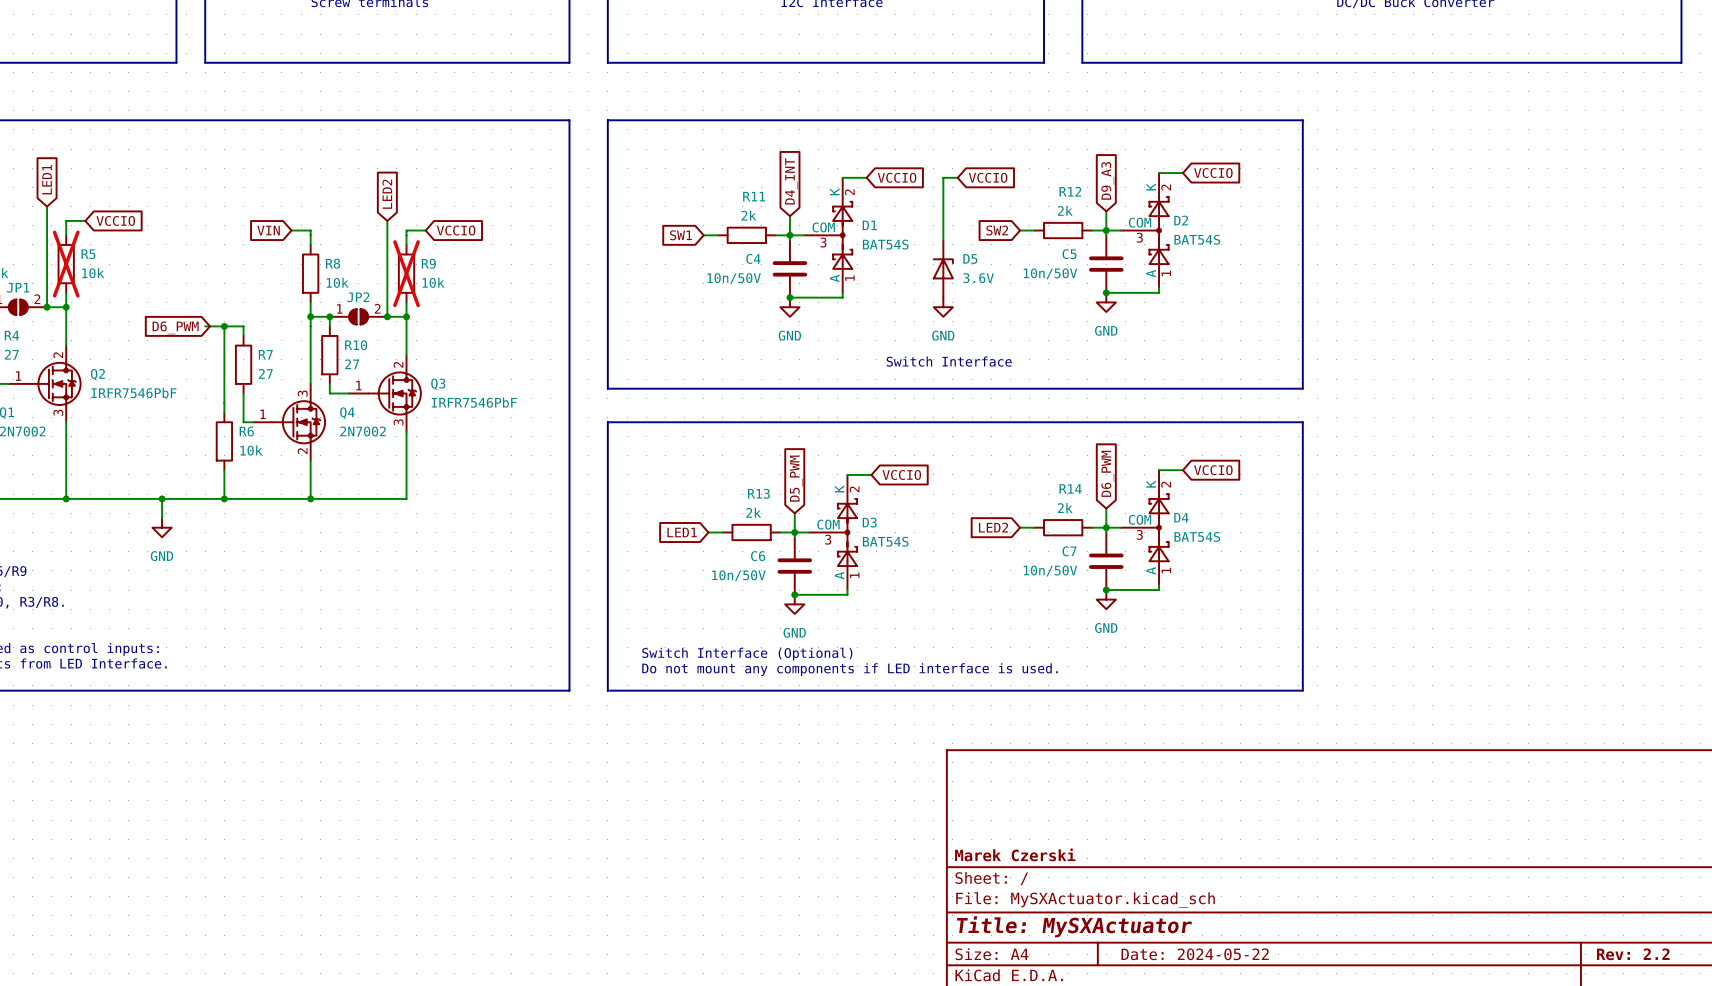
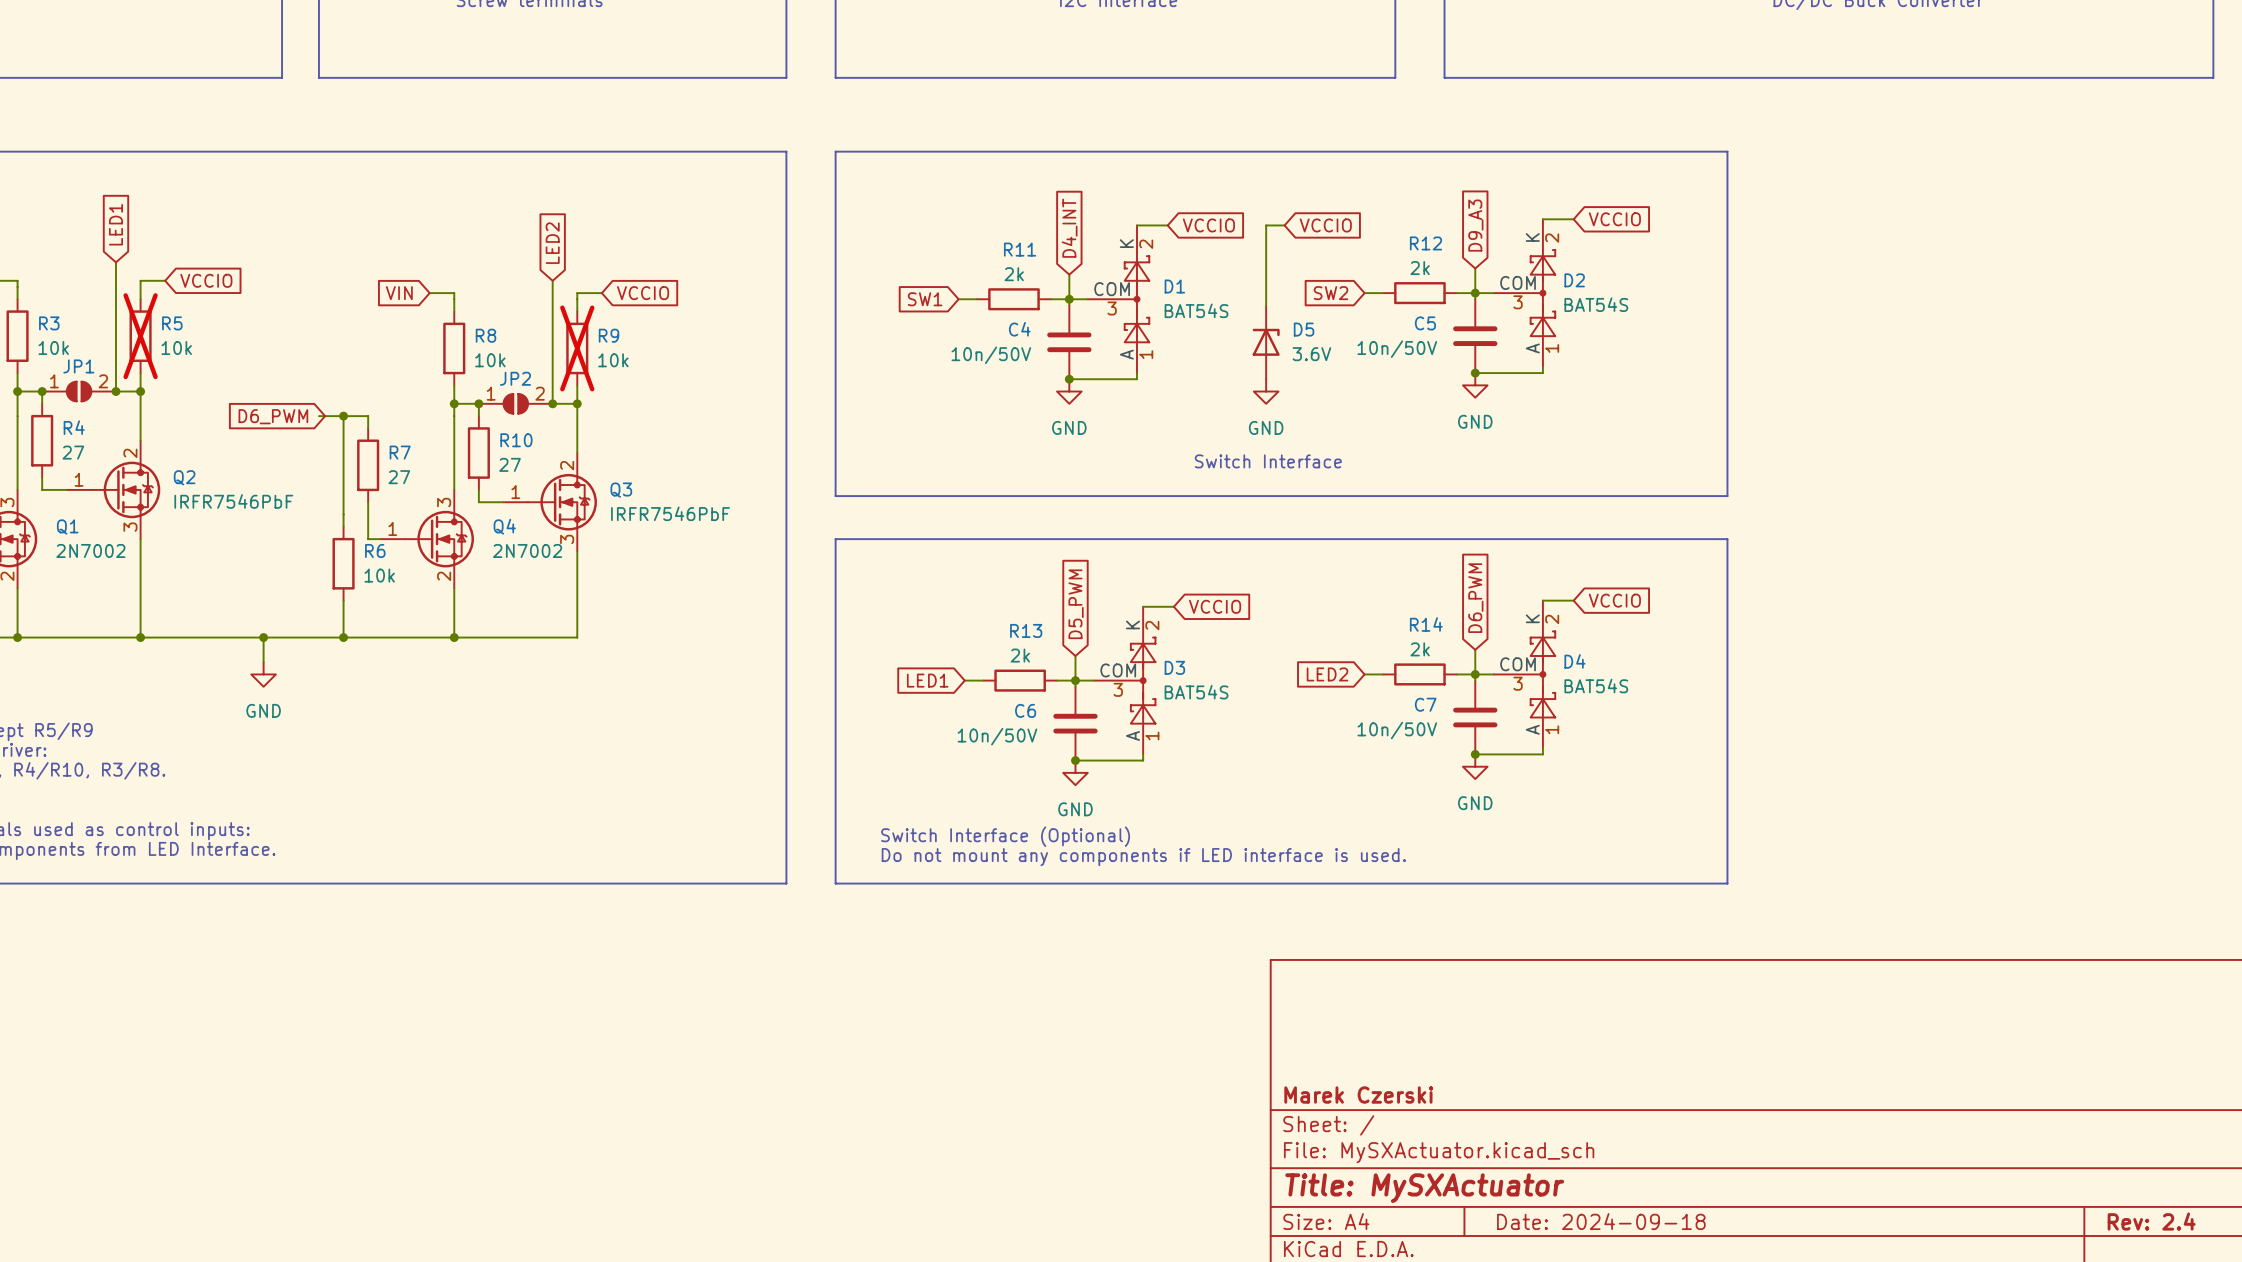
title block: Date: 2024-05-22 (1195, 954) -> Date: 2024-09-18 (1601, 1221)
title block: Rev: 2.2 (1633, 954) -> Rev: 2.4 (2151, 1221)

